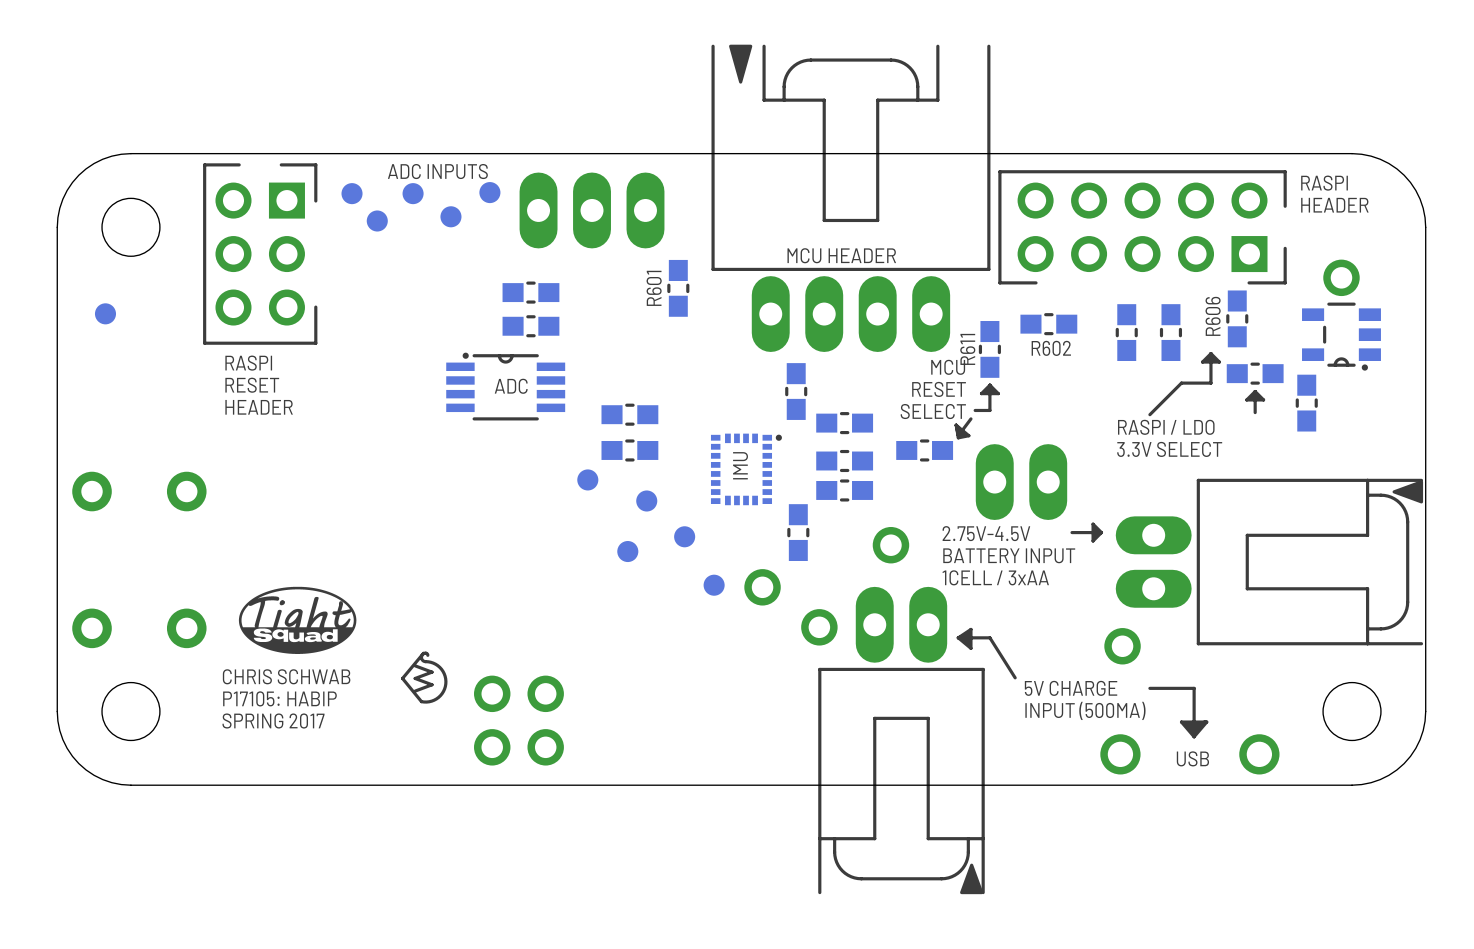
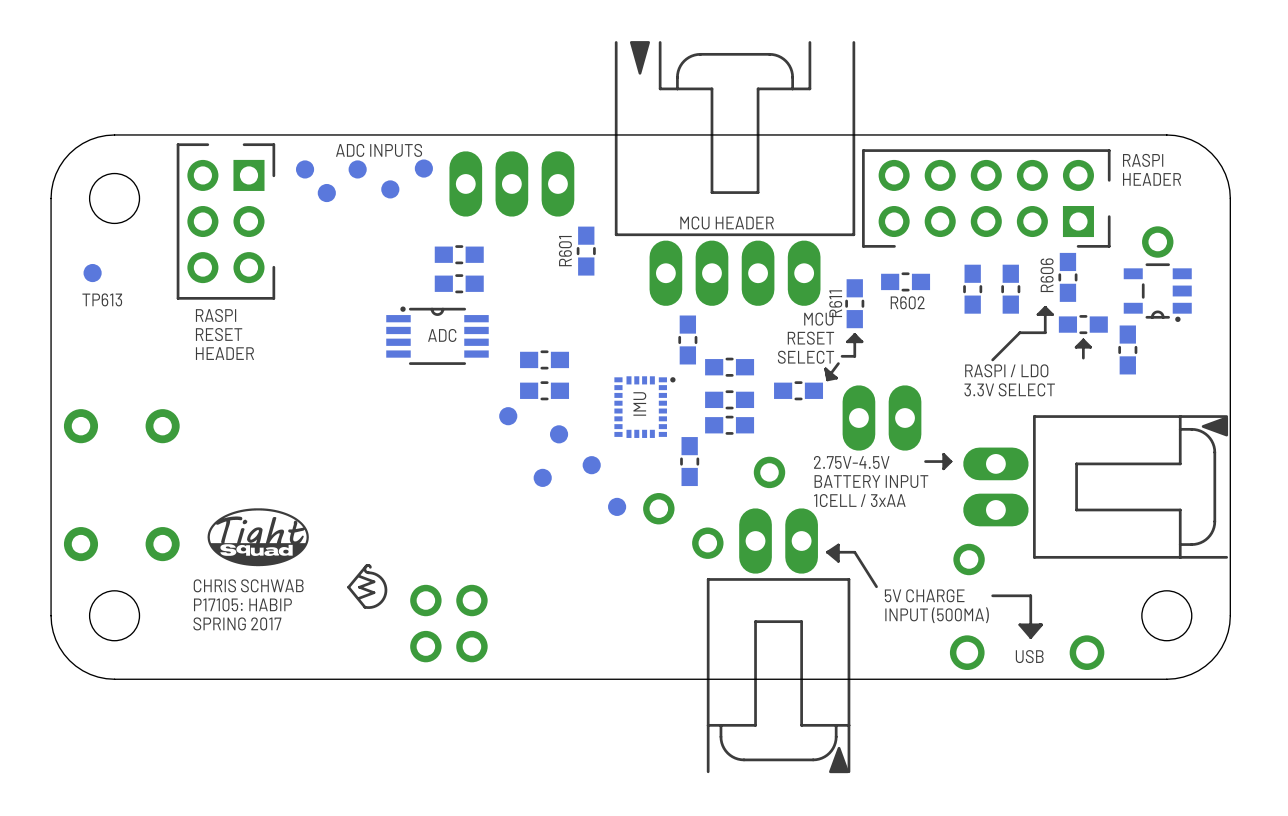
TP613 name: none -> TP613 (102, 299)

